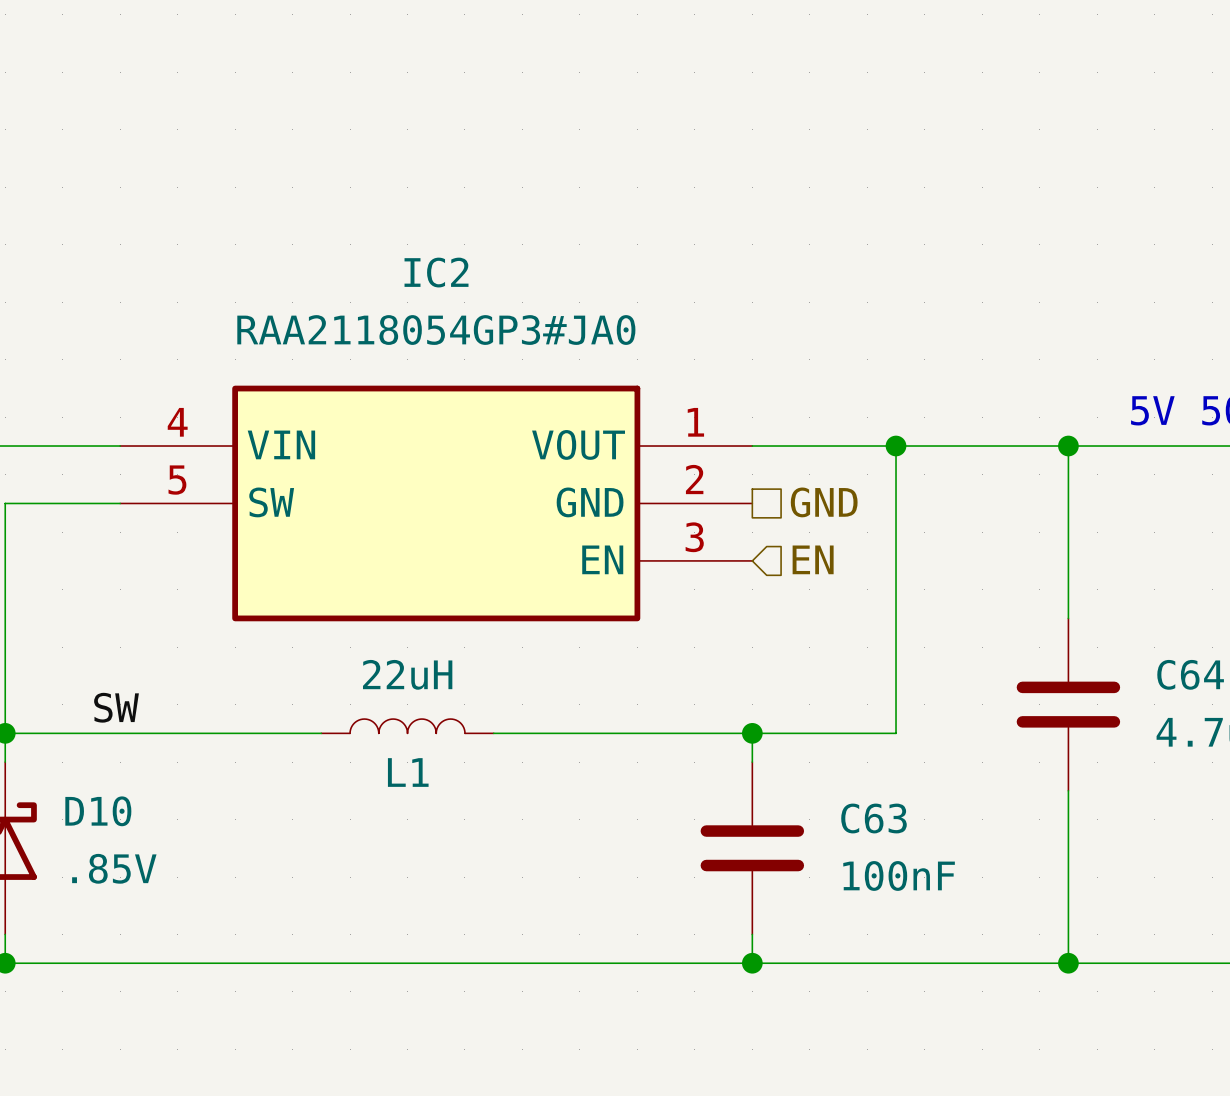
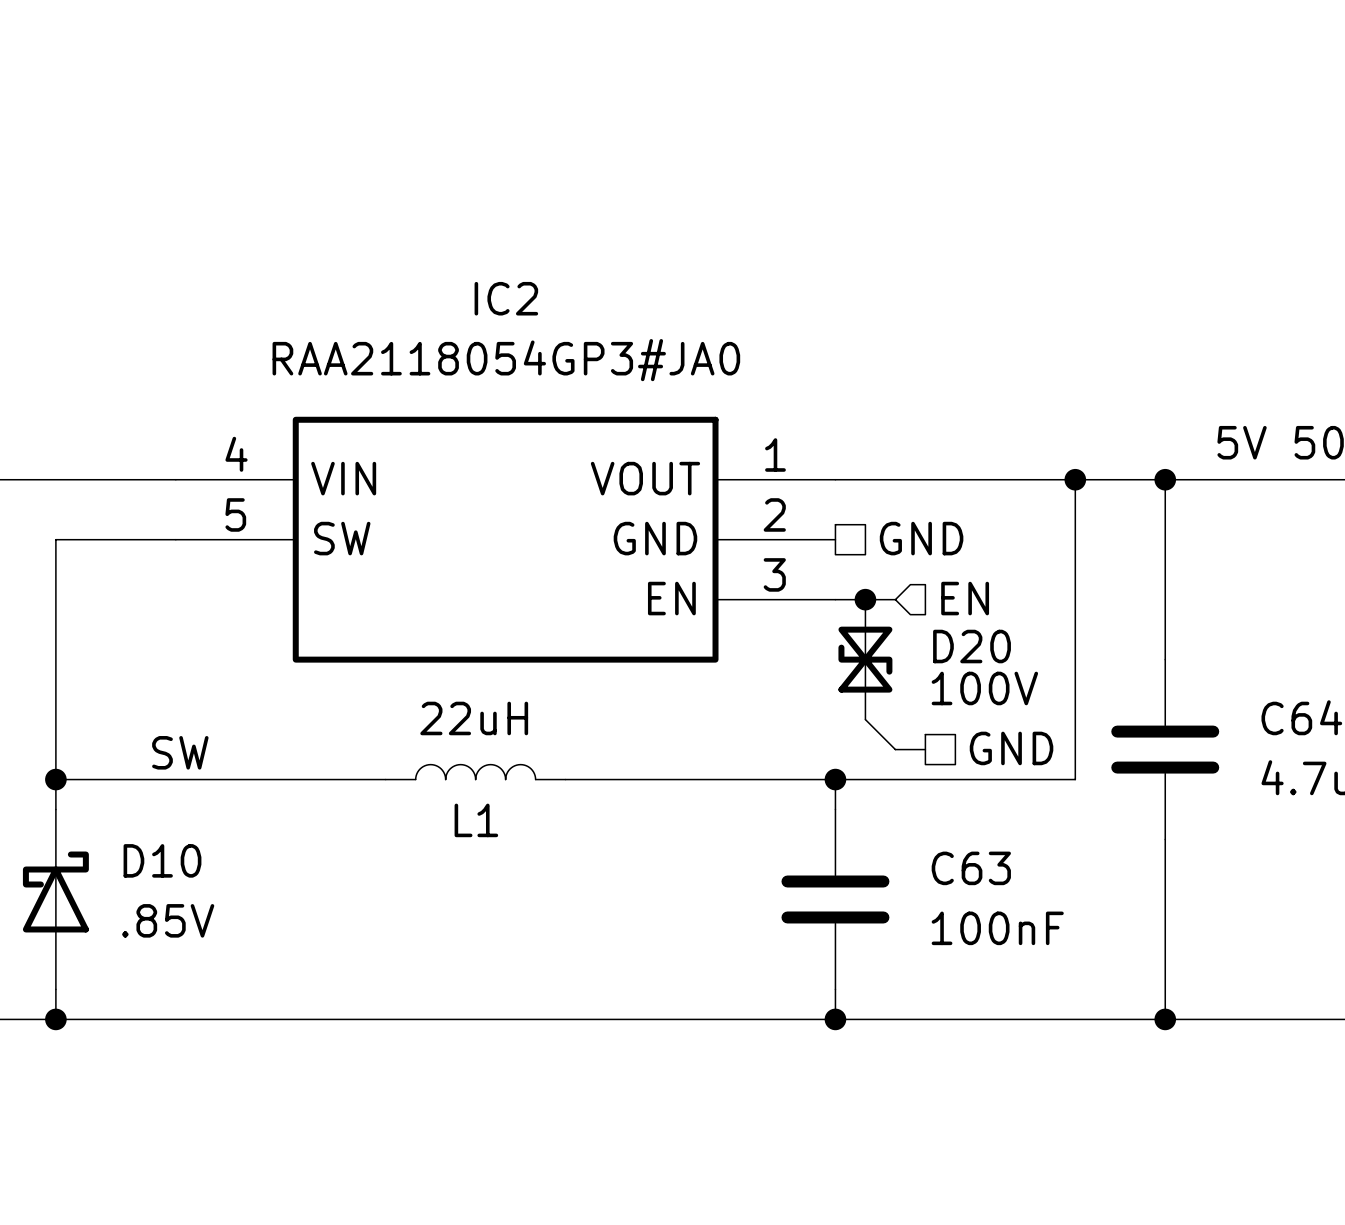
wire: (896, 446) (896, 733) -> (1075, 479) (1075, 779) (985, 779)
junction: (896, 446) -> none
junction: none -> (1075, 479)
hierarchical label position: EN (813, 559) -> EN (965, 598)
wire: none -> (835, 599) (895, 599)
junction: none -> (865, 599)
D20: none -> 100V (865, 659)
wire: none -> (865, 719) (895, 749) (925, 749)
hierarchical label: none -> GND (1011, 748)

